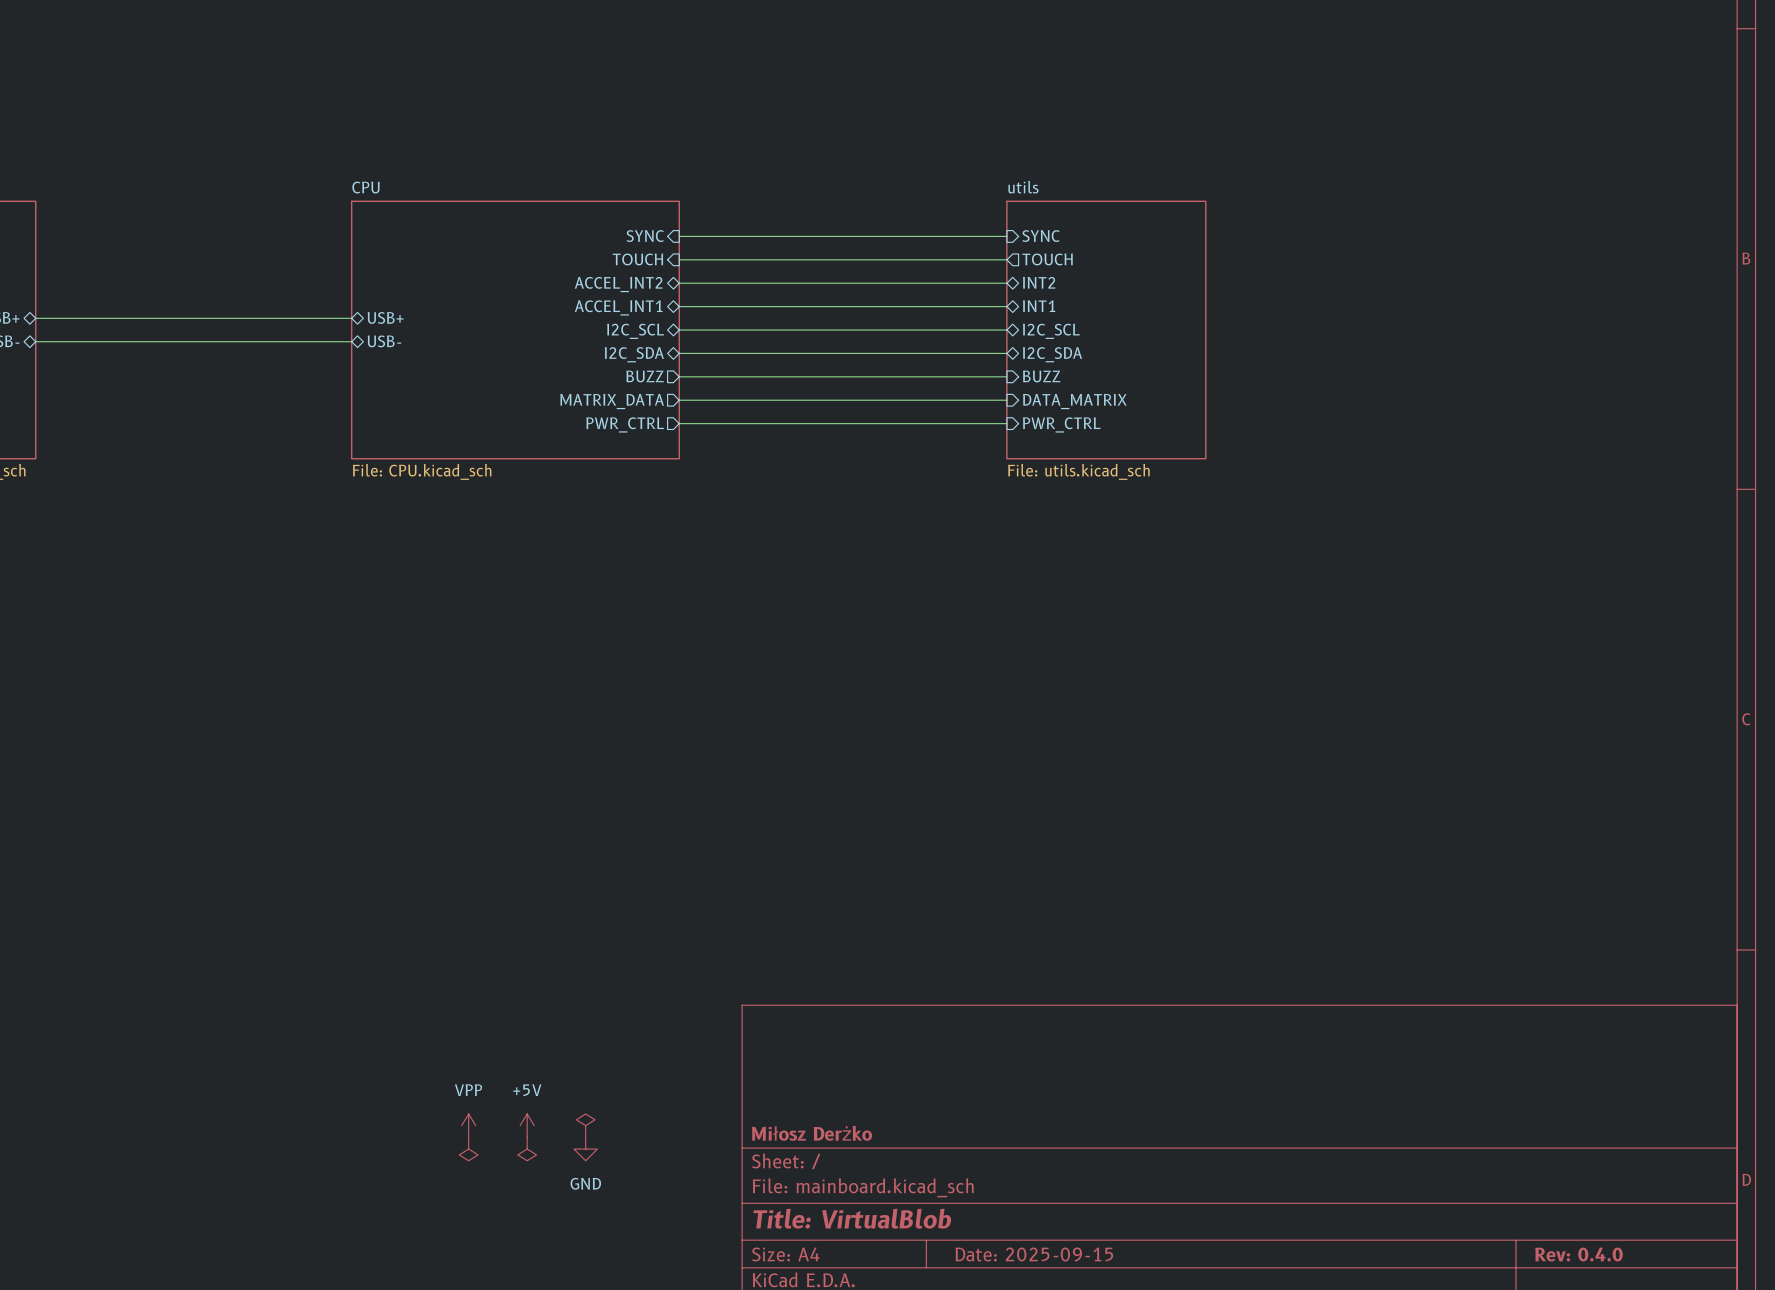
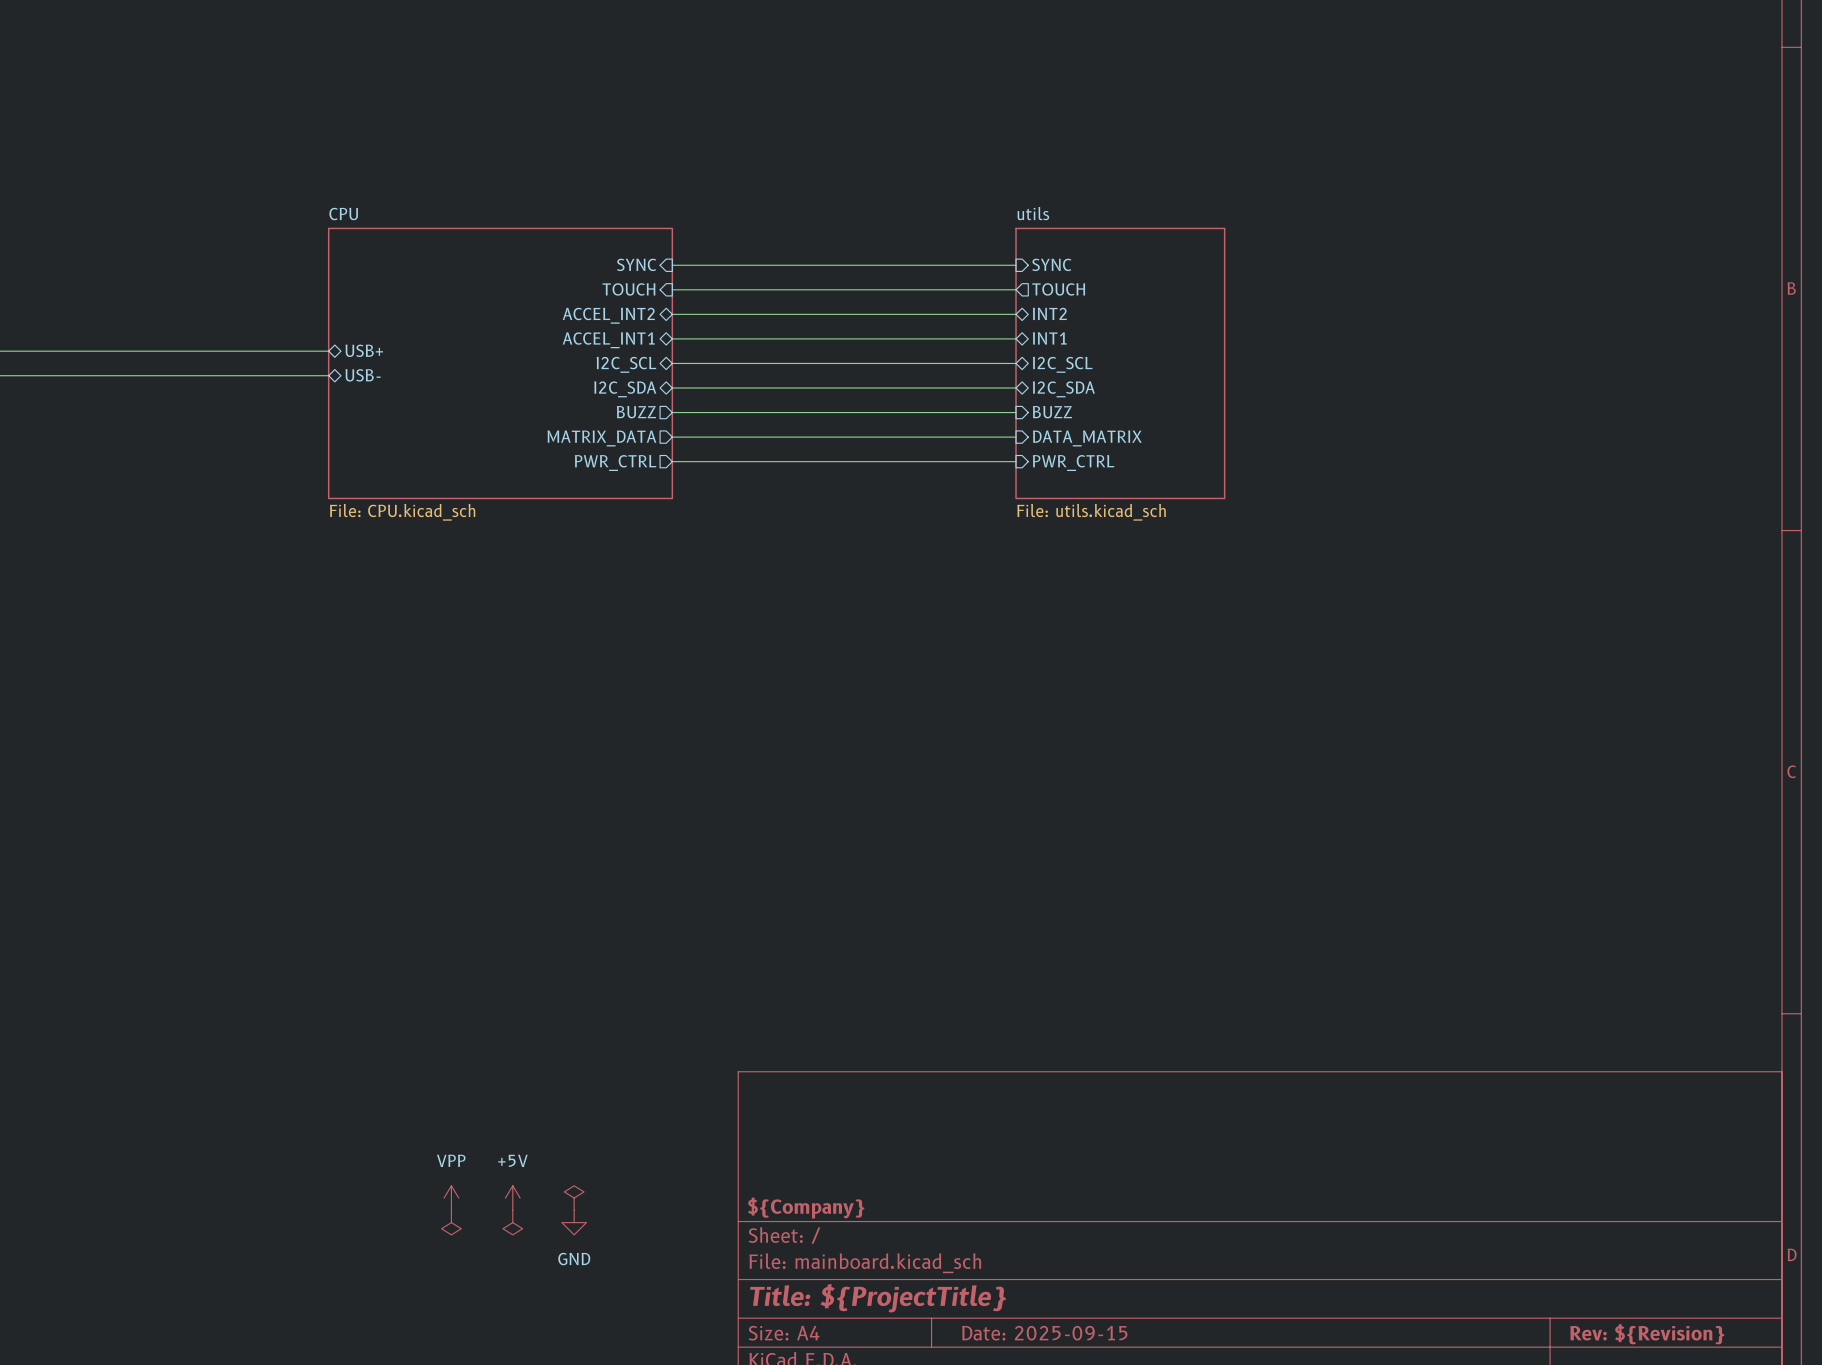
title block: Miłosz Derżko (812, 1133) -> ${Company} (806, 1207)
title block: Title: VirtualBlob (852, 1218) -> Title: ${ProjectTitle} (877, 1298)
title block: Rev: 0.4.0 (1578, 1254) -> Rev: ${Revision} (1647, 1334)

